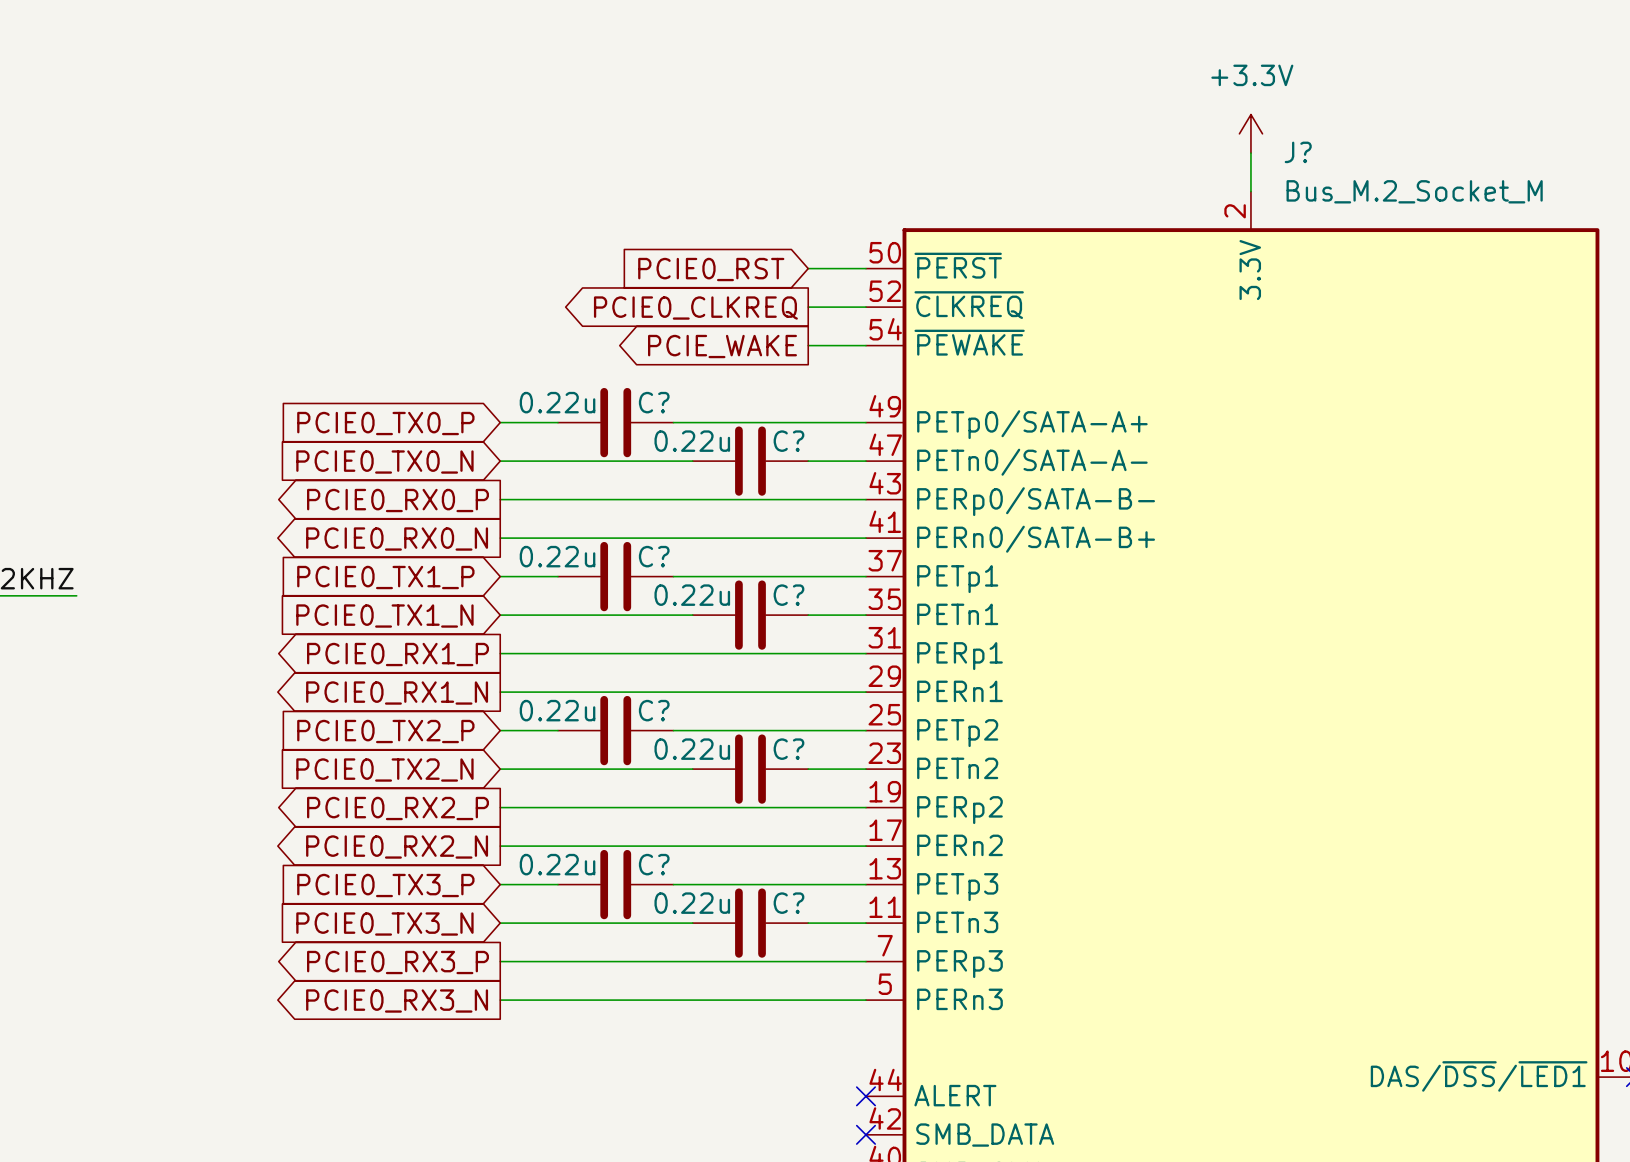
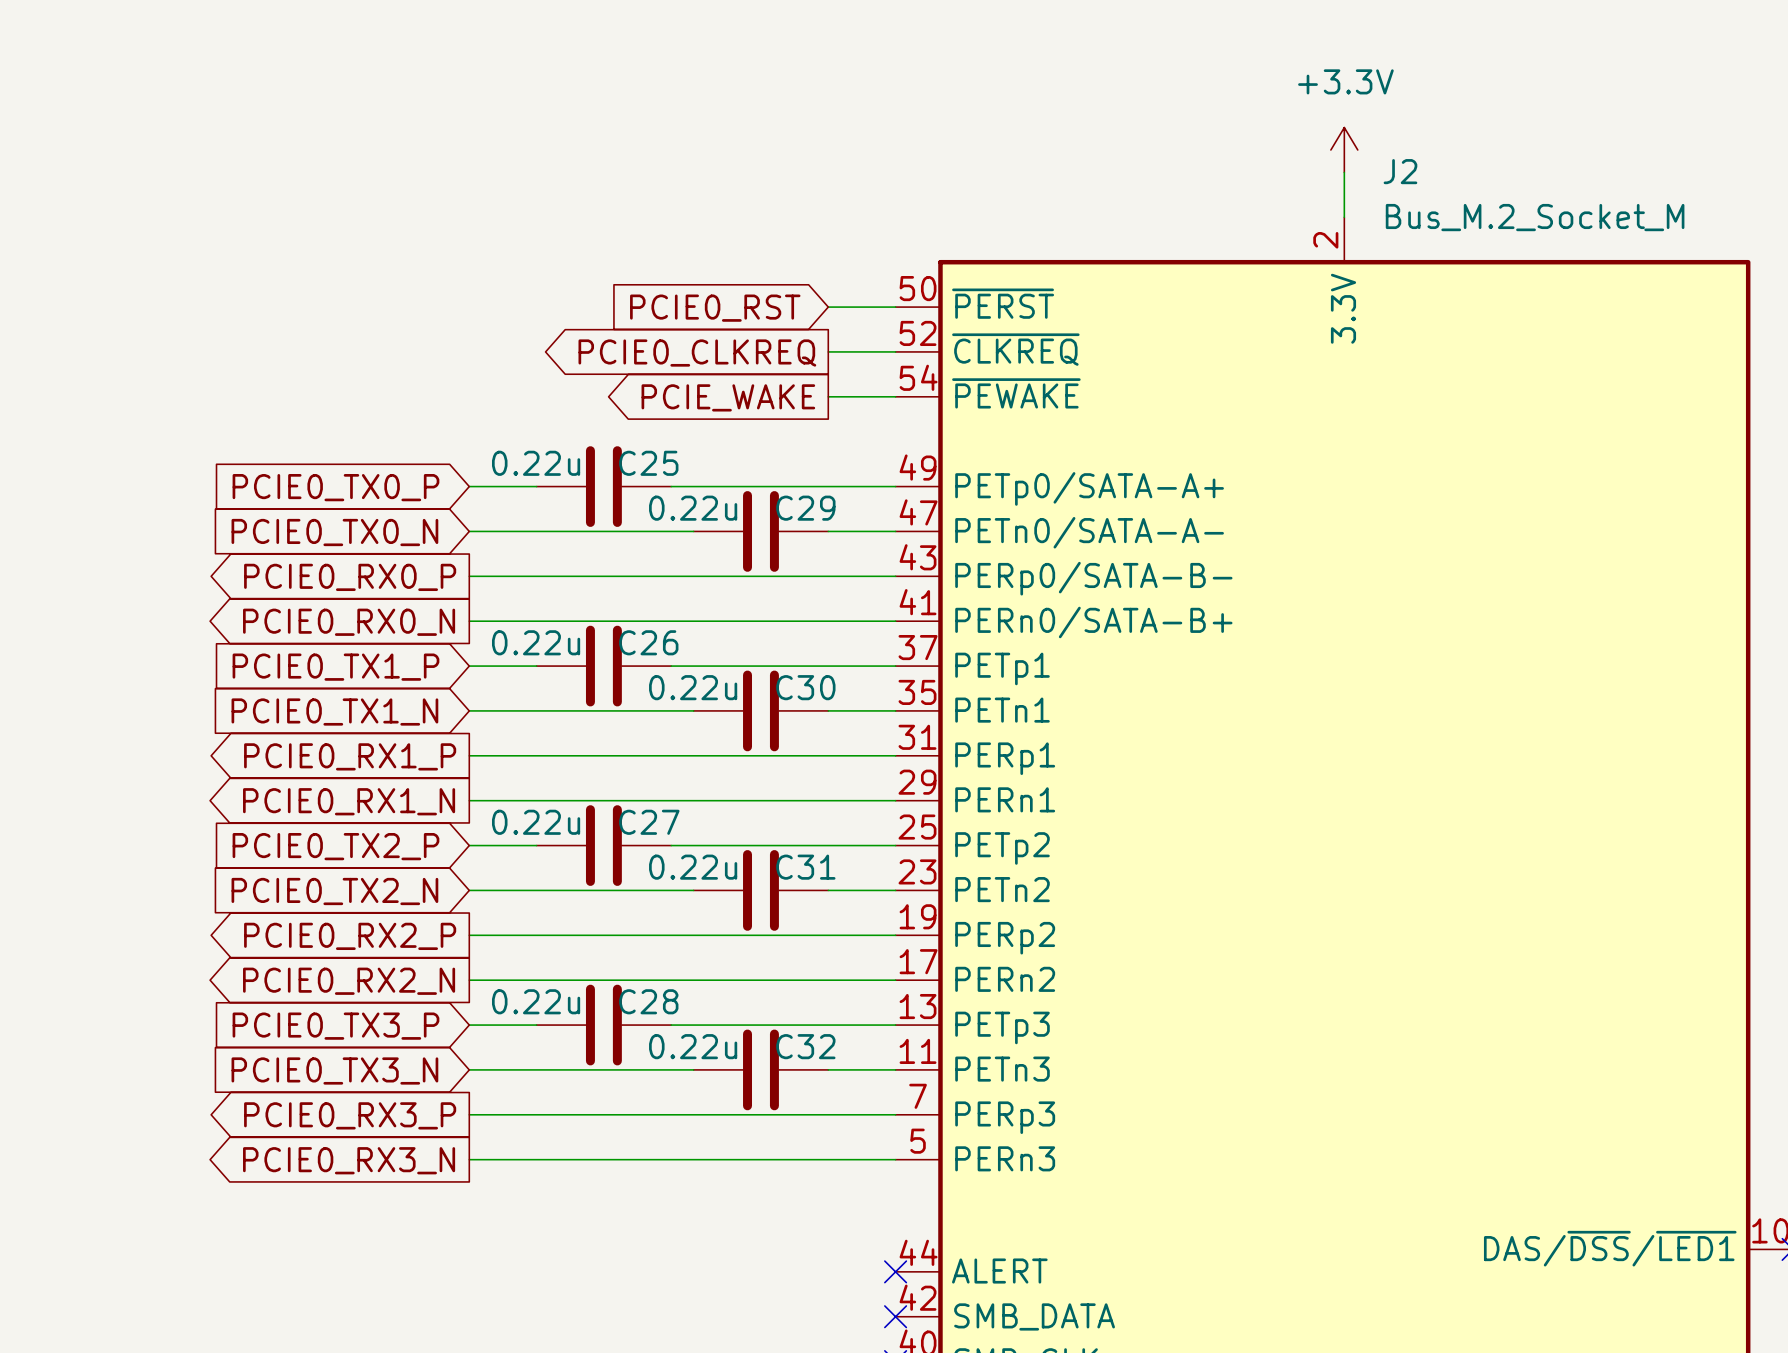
J? name: J? (1298, 152) -> J2 (1400, 171)
C? name: C? (654, 402) -> C25 (648, 463)
C? name: C? (788, 441) -> C29 (805, 508)
C? name: C? (654, 556) -> C26 (648, 642)
C? name: C? (788, 595) -> C30 (805, 687)
C? name: C? (654, 710) -> C27 (649, 822)
C? name: C? (788, 749) -> C31 (805, 867)
C? name: C? (654, 864) -> C28 (648, 1001)
C? name: C? (788, 903) -> C32 (805, 1046)

